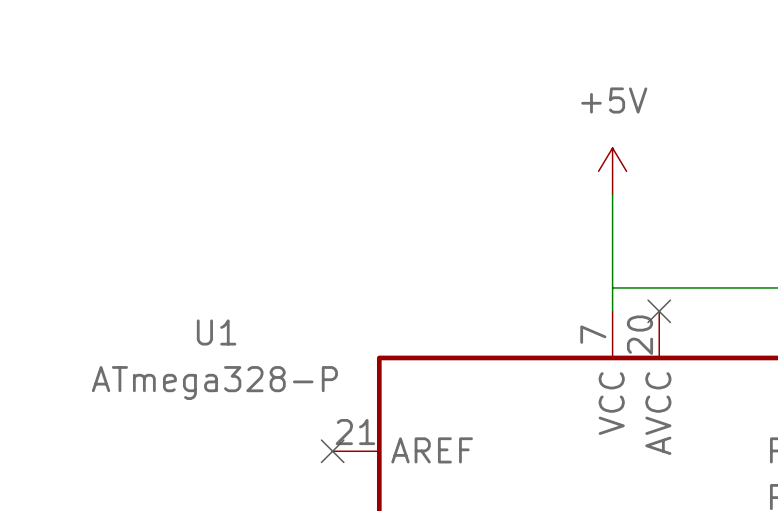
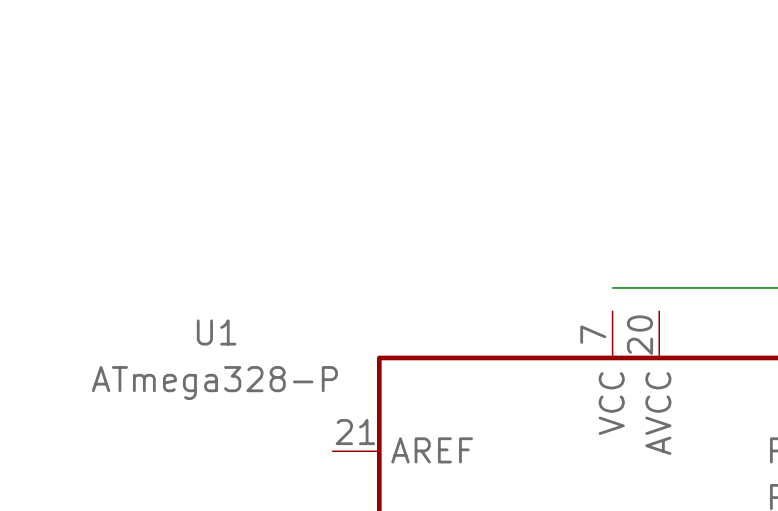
power symbol: +5V (612, 171) -> none
wire: (612, 194) (612, 311) -> none
no-connect mark: (659, 311) -> none
no-connect mark: (332, 451) -> none

